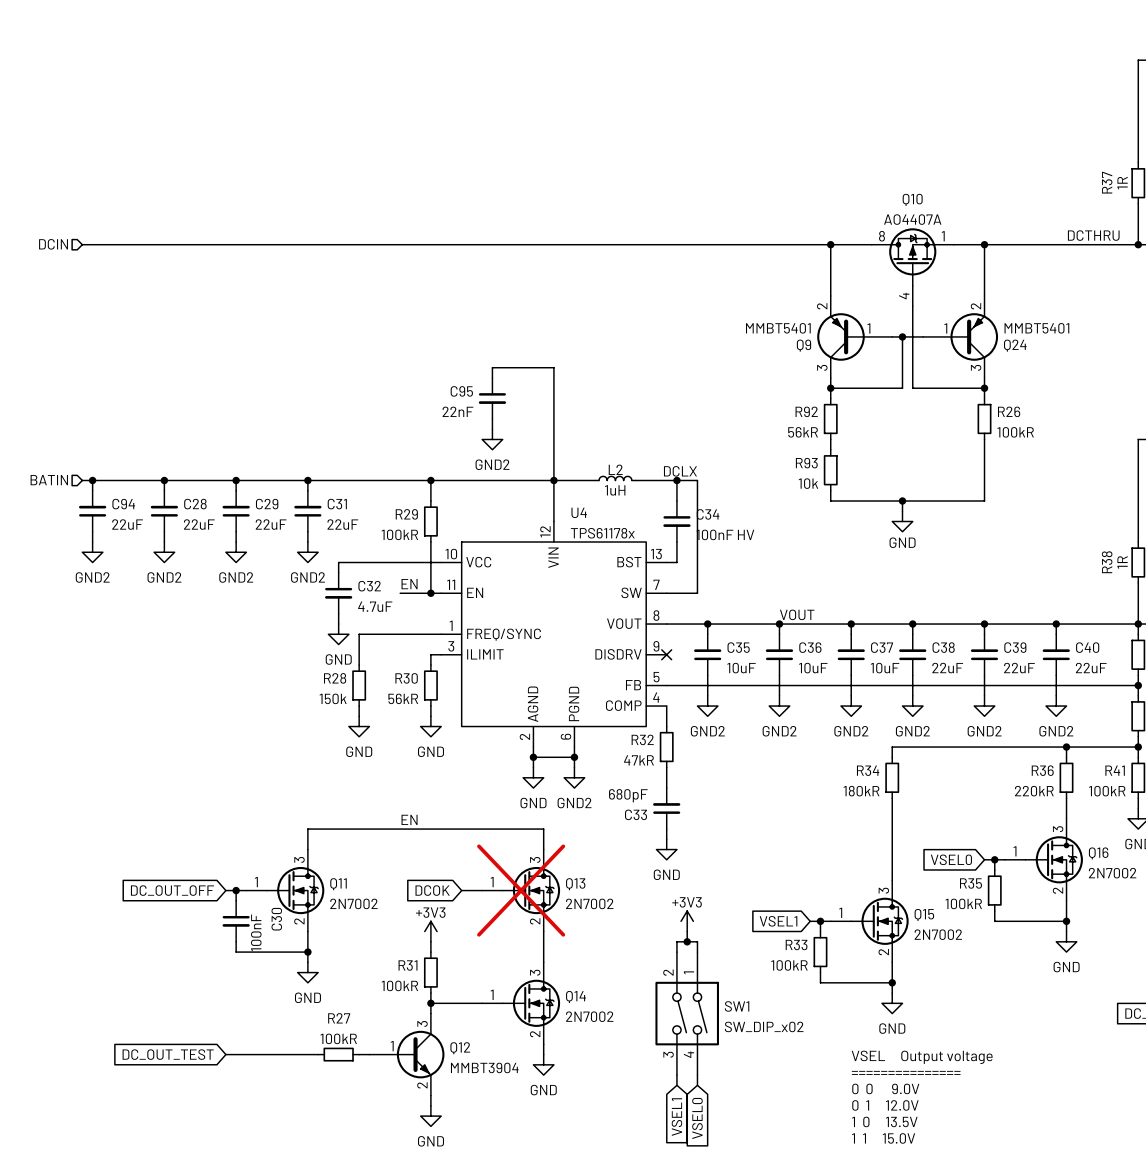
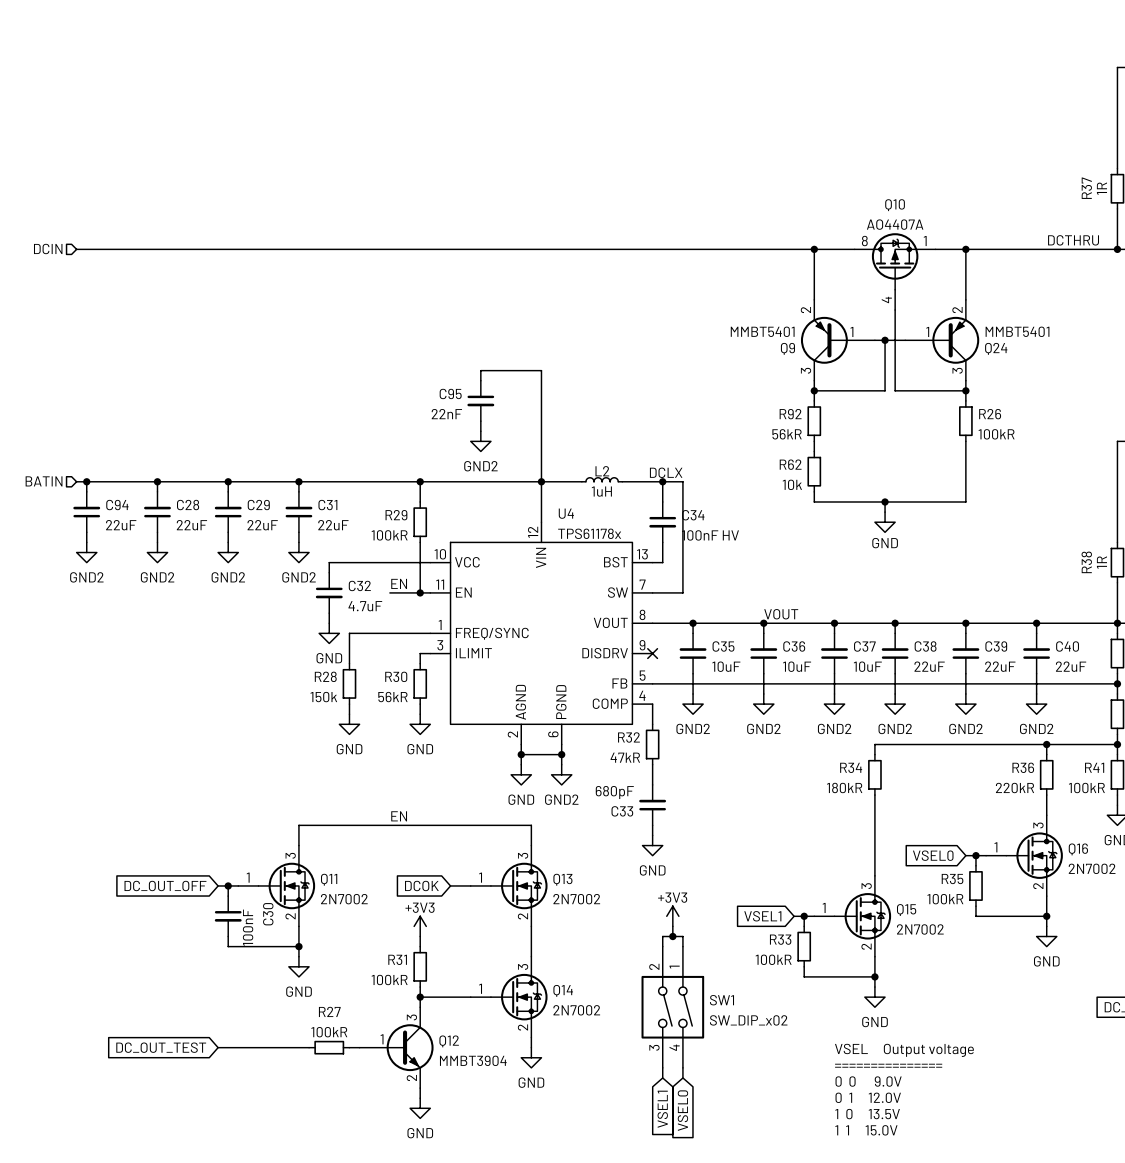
R93 name: R93 (806, 463) -> R62 (790, 464)
Q13 do-not-place cross: (521, 890) -> none

